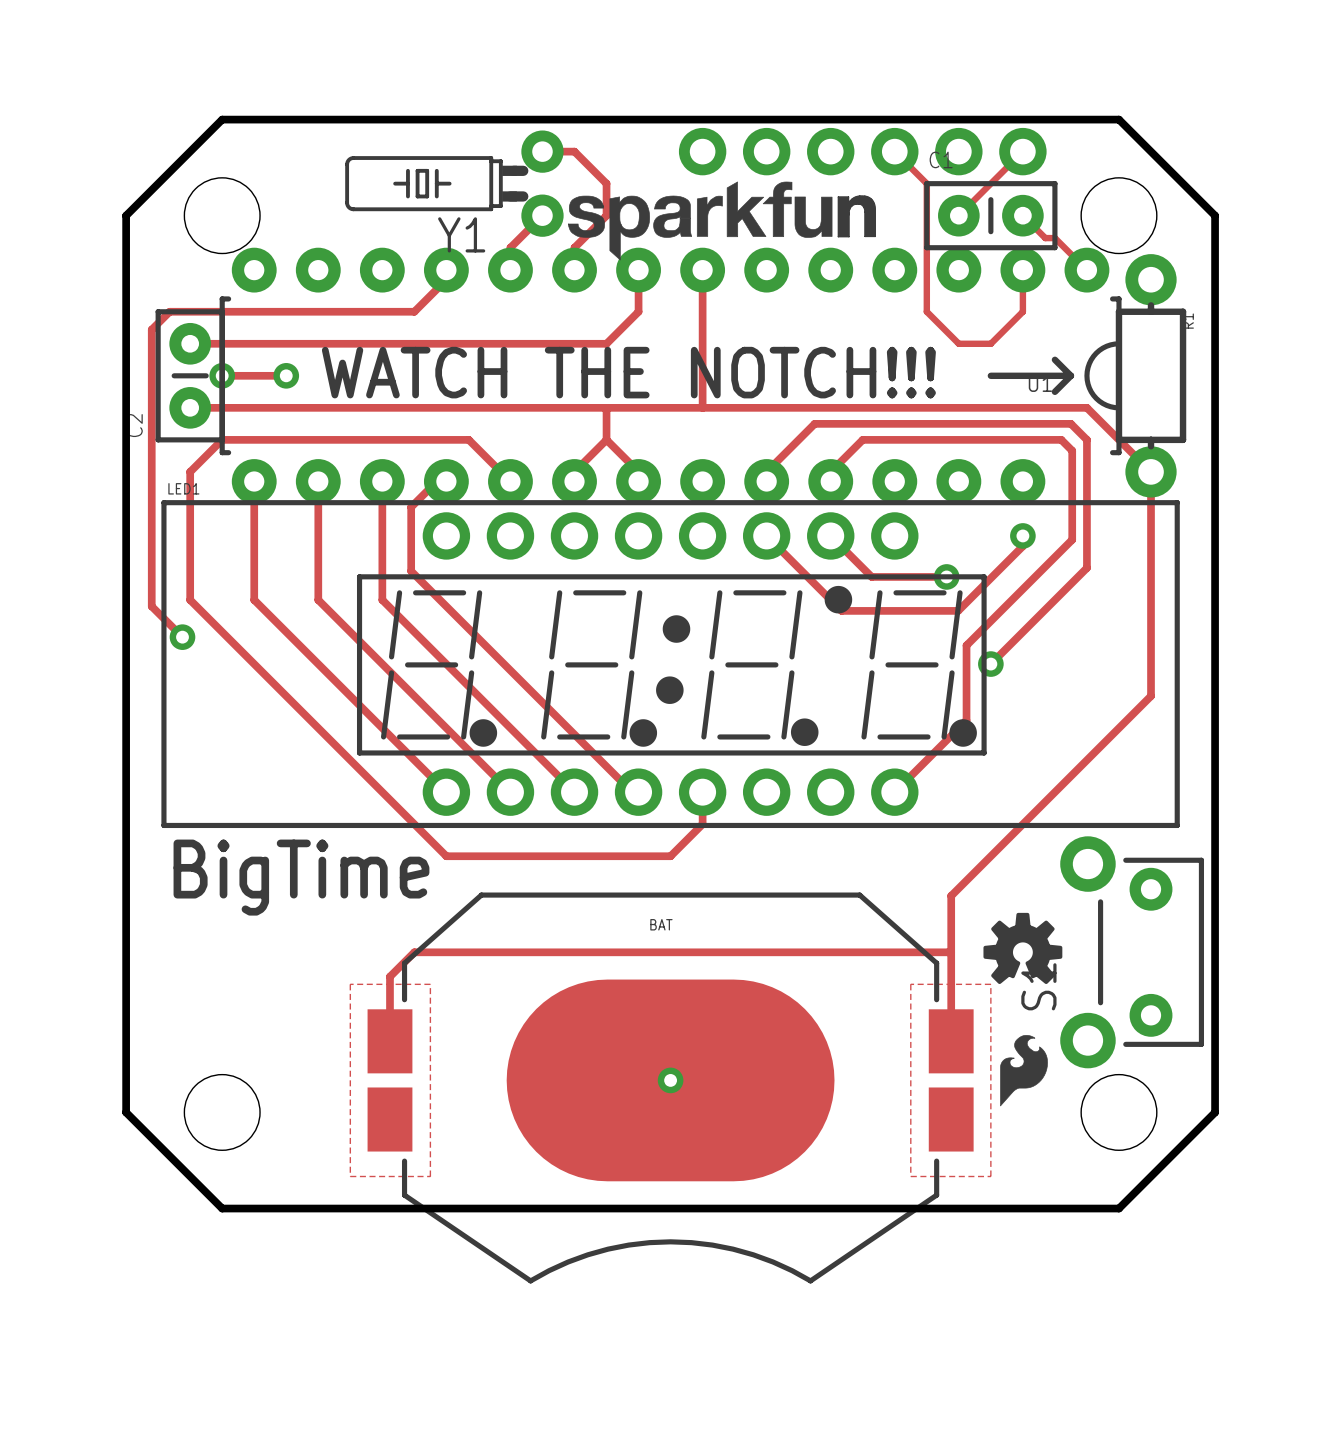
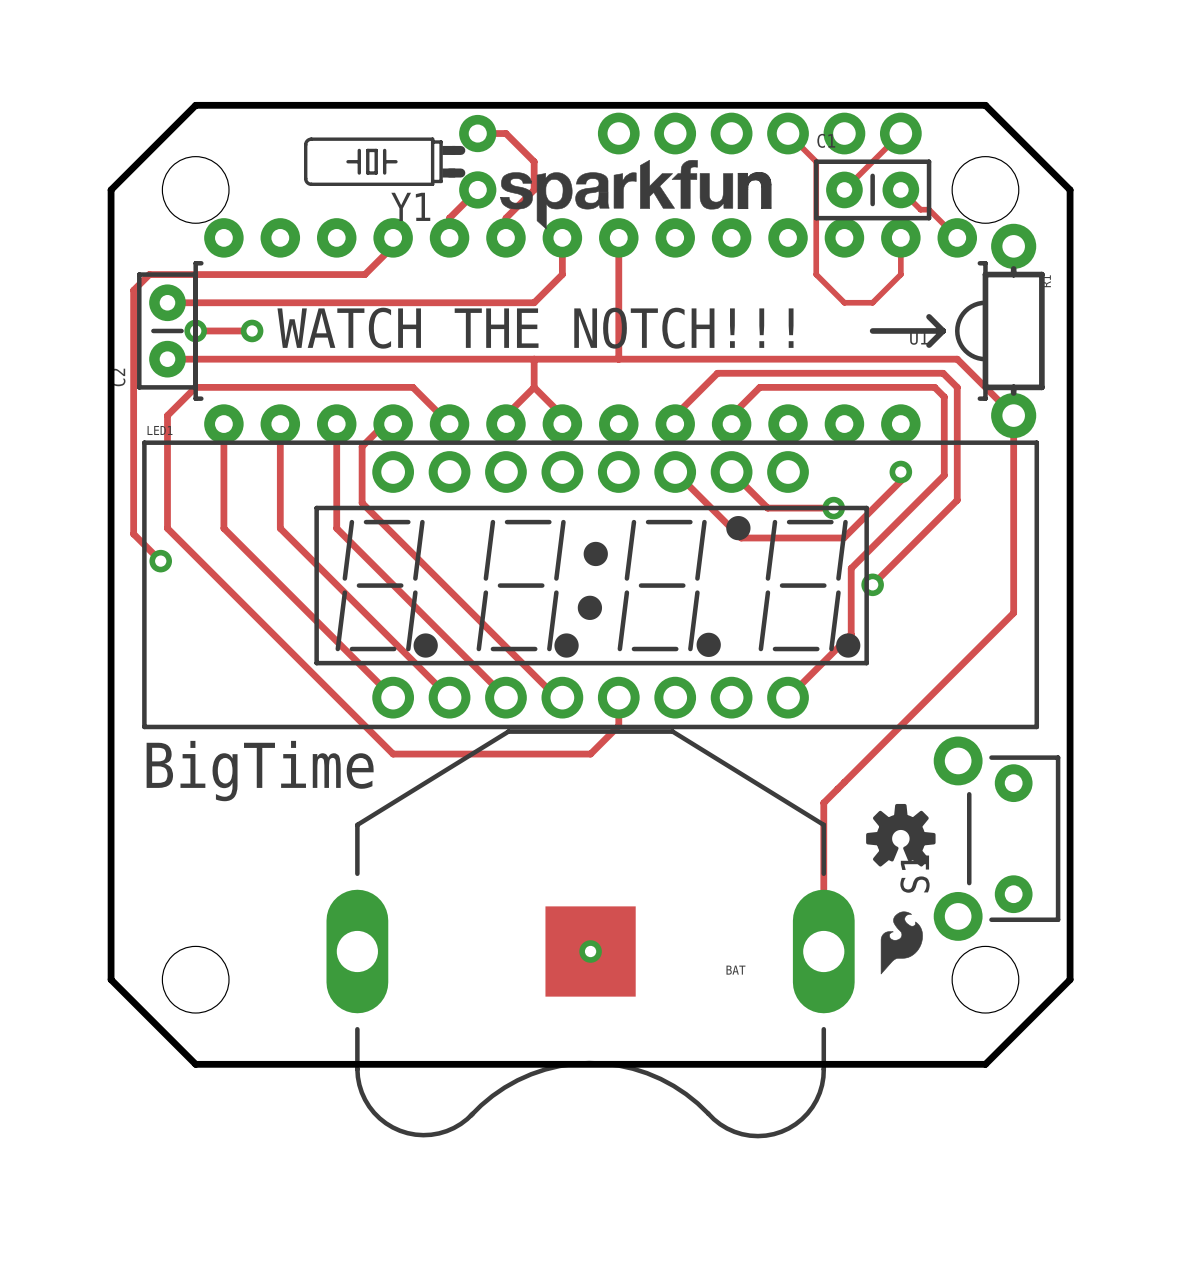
track: (951, 895) (951, 1041) -> (837, 789) (823, 802) (823, 951)
track: (951, 952) (414, 952) (389, 976) (389, 1041) (393, 1037) -> none
zone outline: (350, 984) (430, 984) (430, 1176) (350, 1176) (350, 984) -> none
zone outline: (910, 984) (990, 984) (990, 1176) (910, 1176) (910, 984) -> none
BAT: none -> (590, 933)
BAT: (670, 1087) -> none

